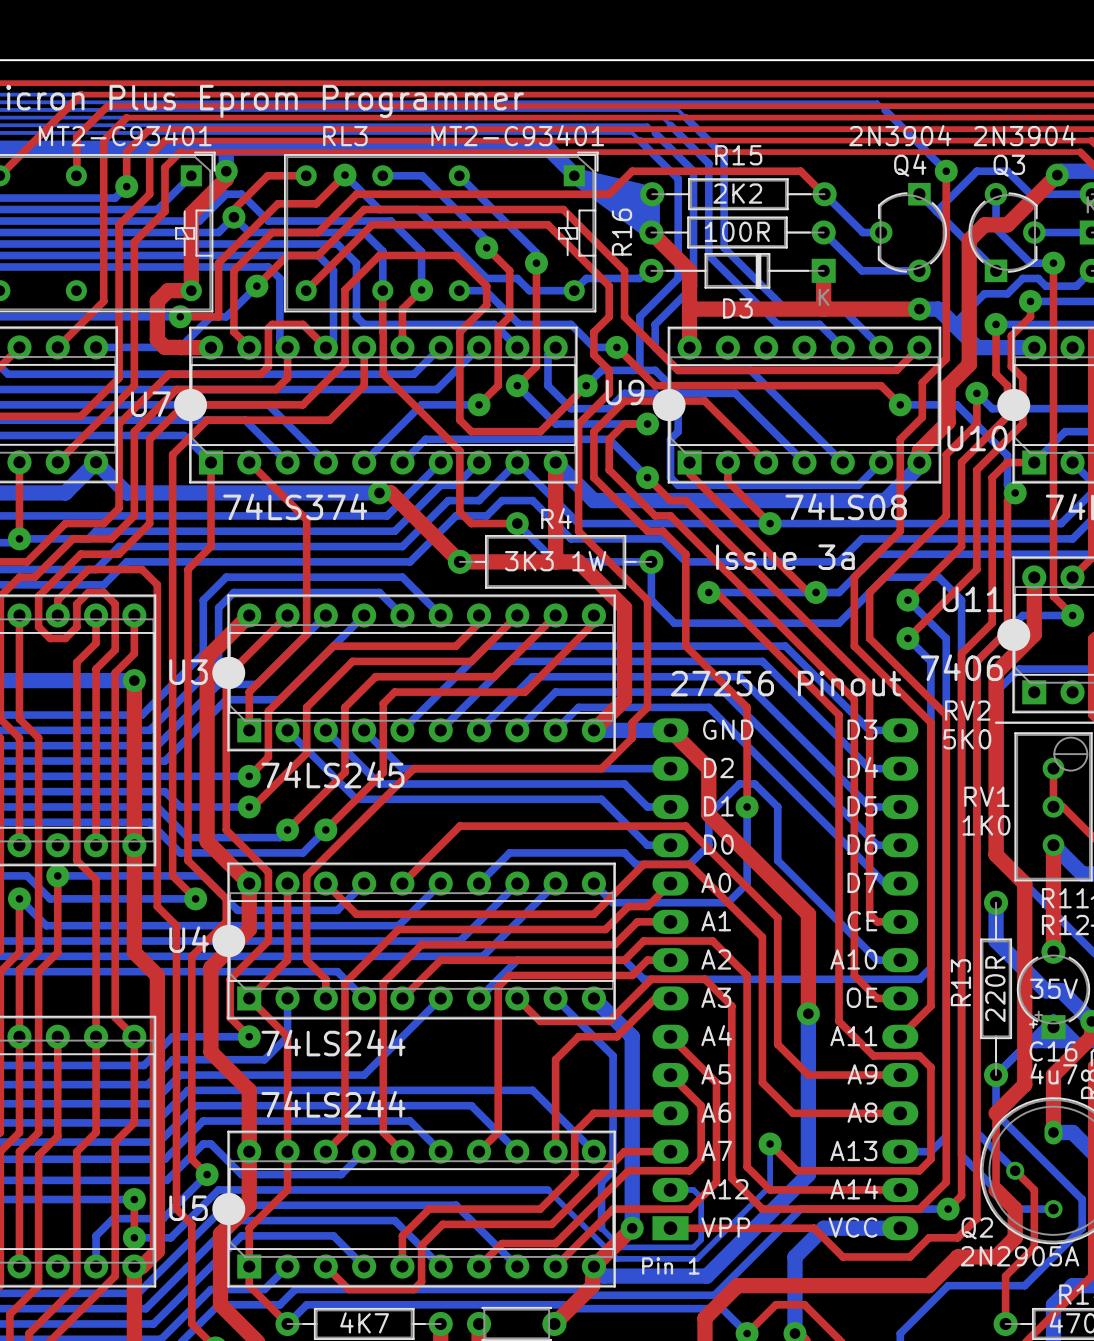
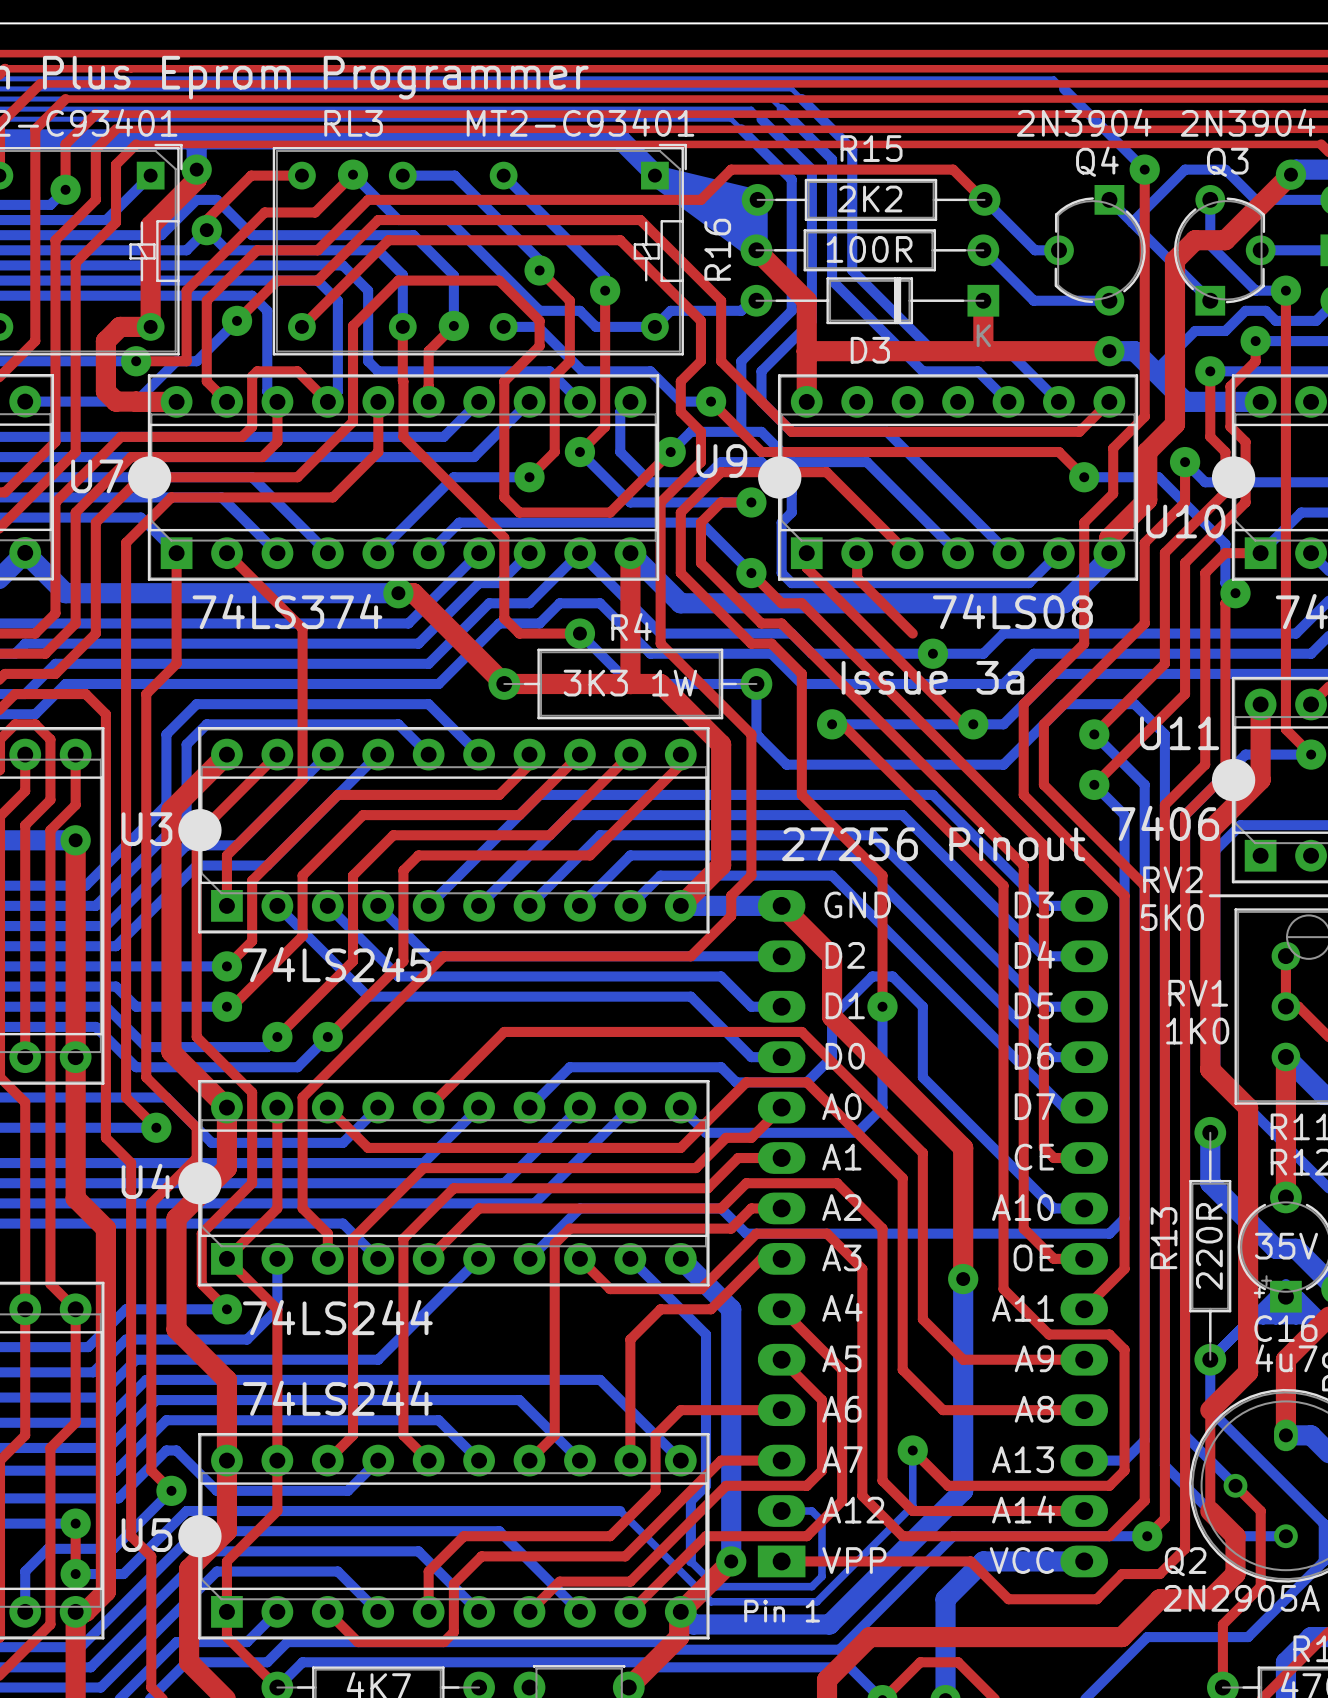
bottom track: (678, 523) (839, 523) -> (791, 633) (811, 653) (983, 653) (1003, 633)
via position: (770, 523) -> (932, 653)

